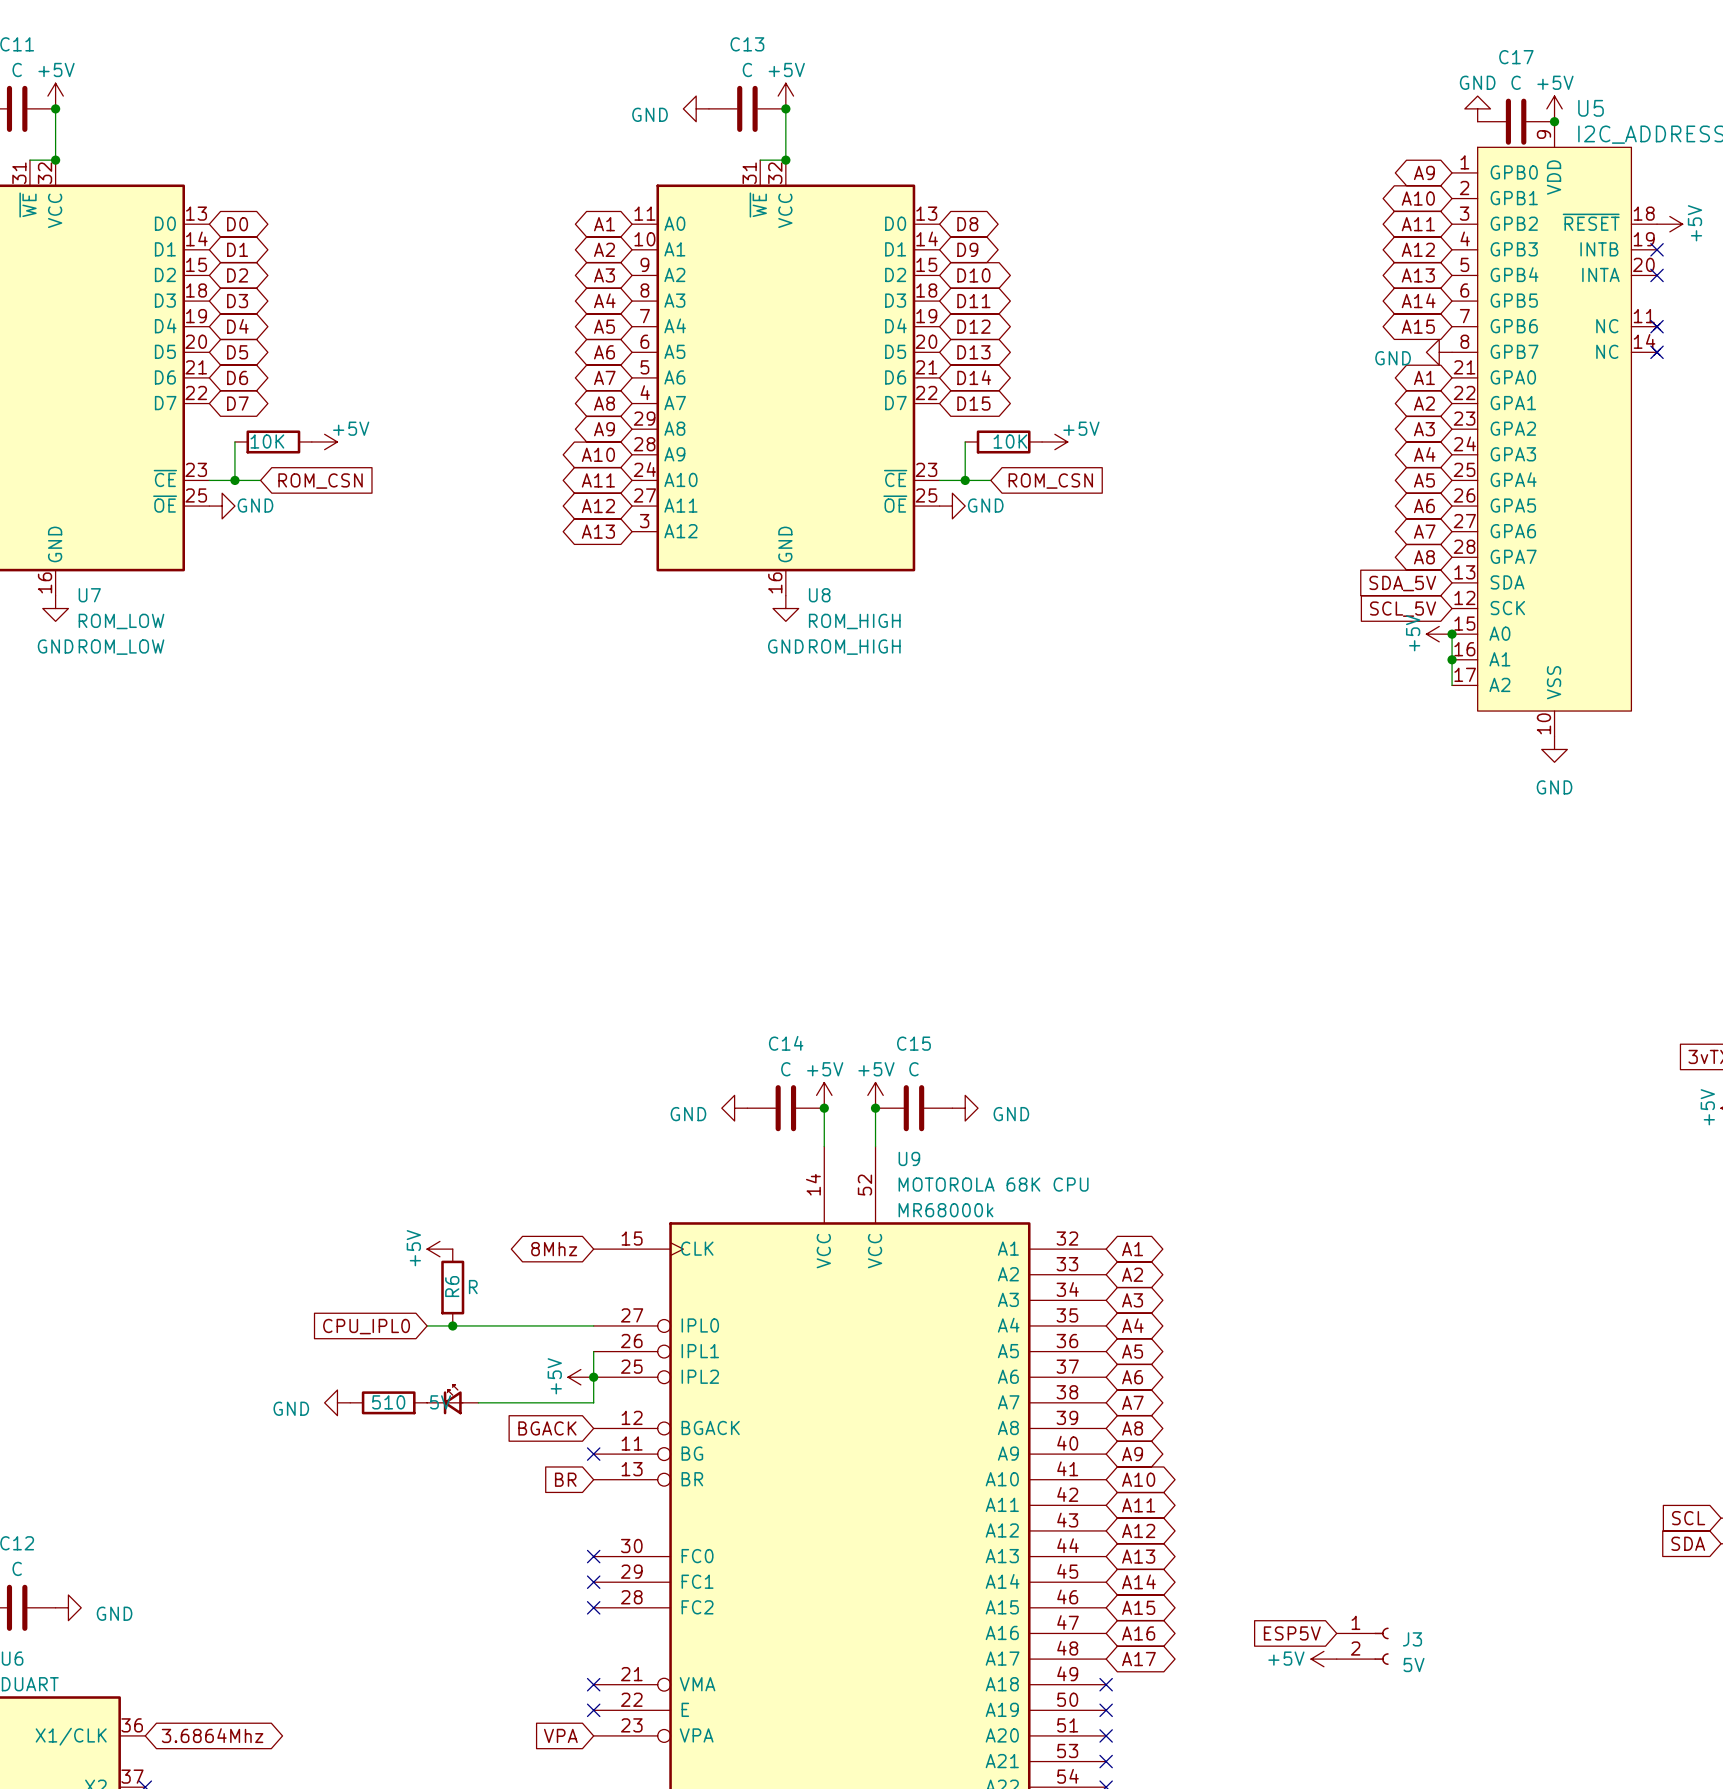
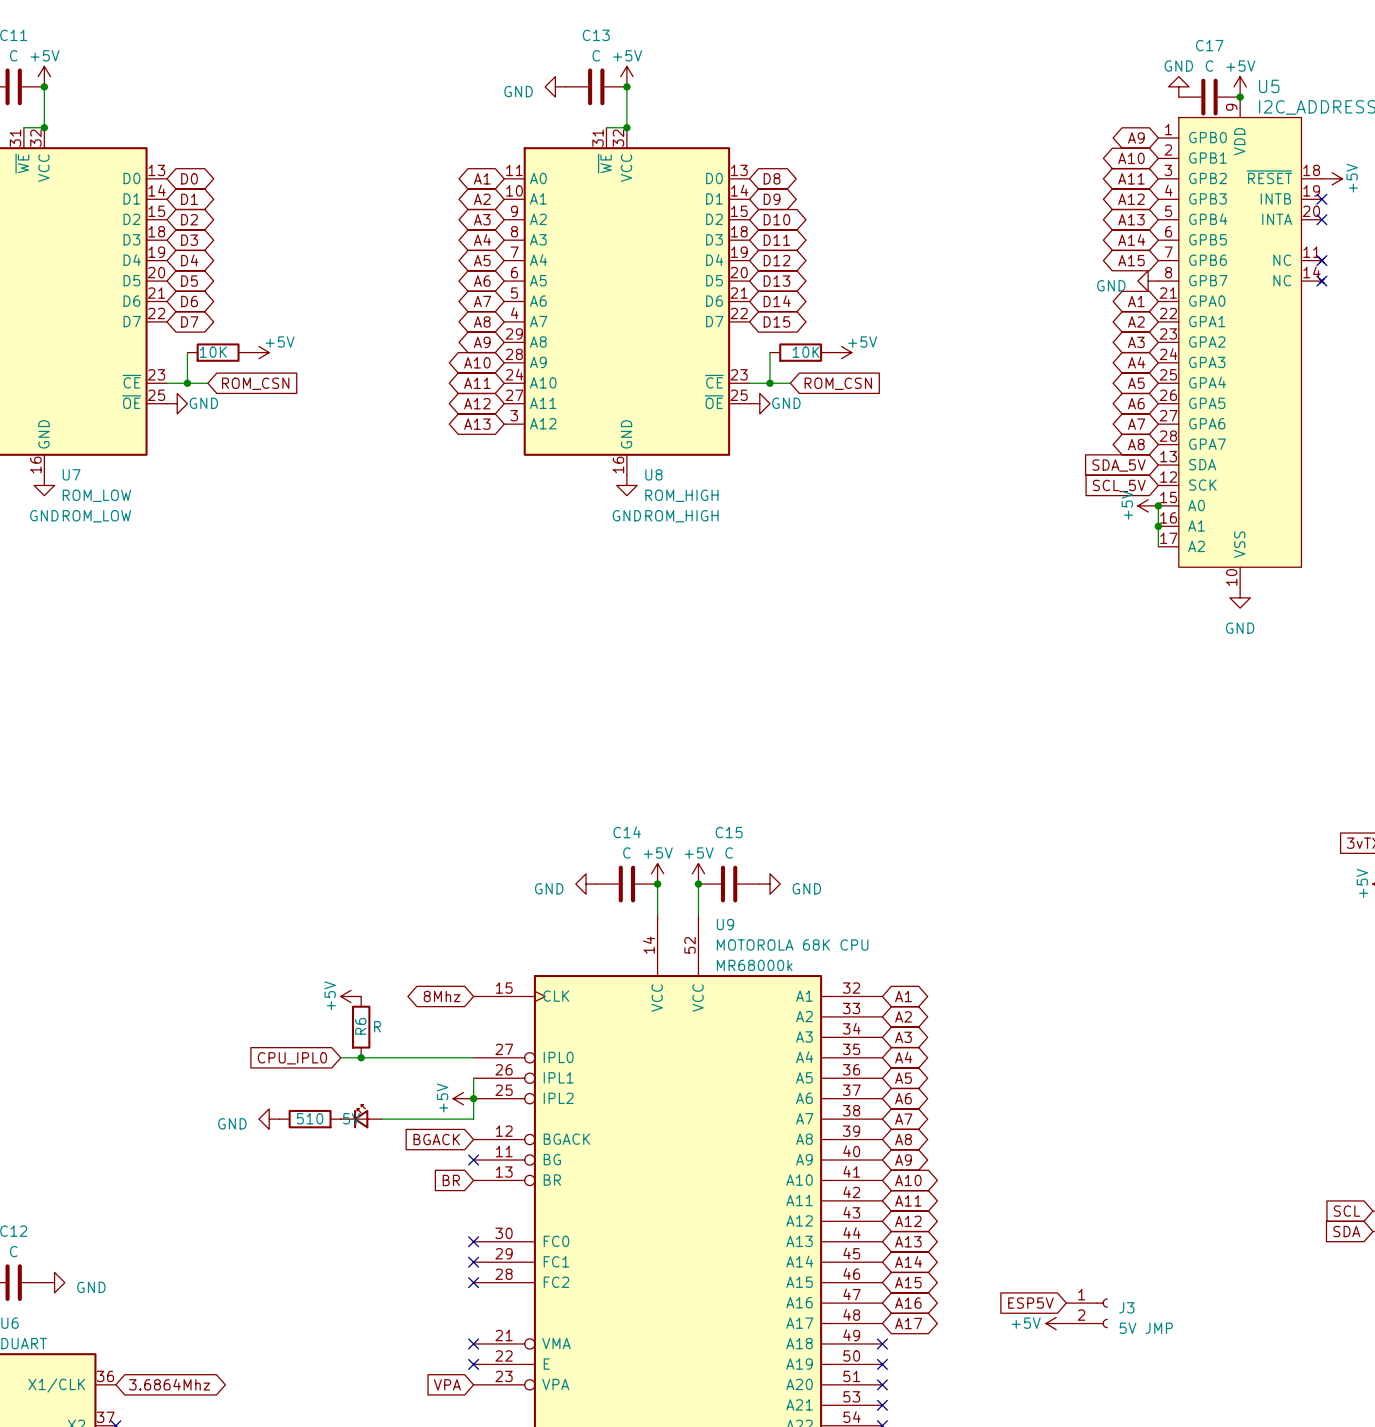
J3 value: 5V (1414, 1664) -> 5V JMP (1146, 1328)

